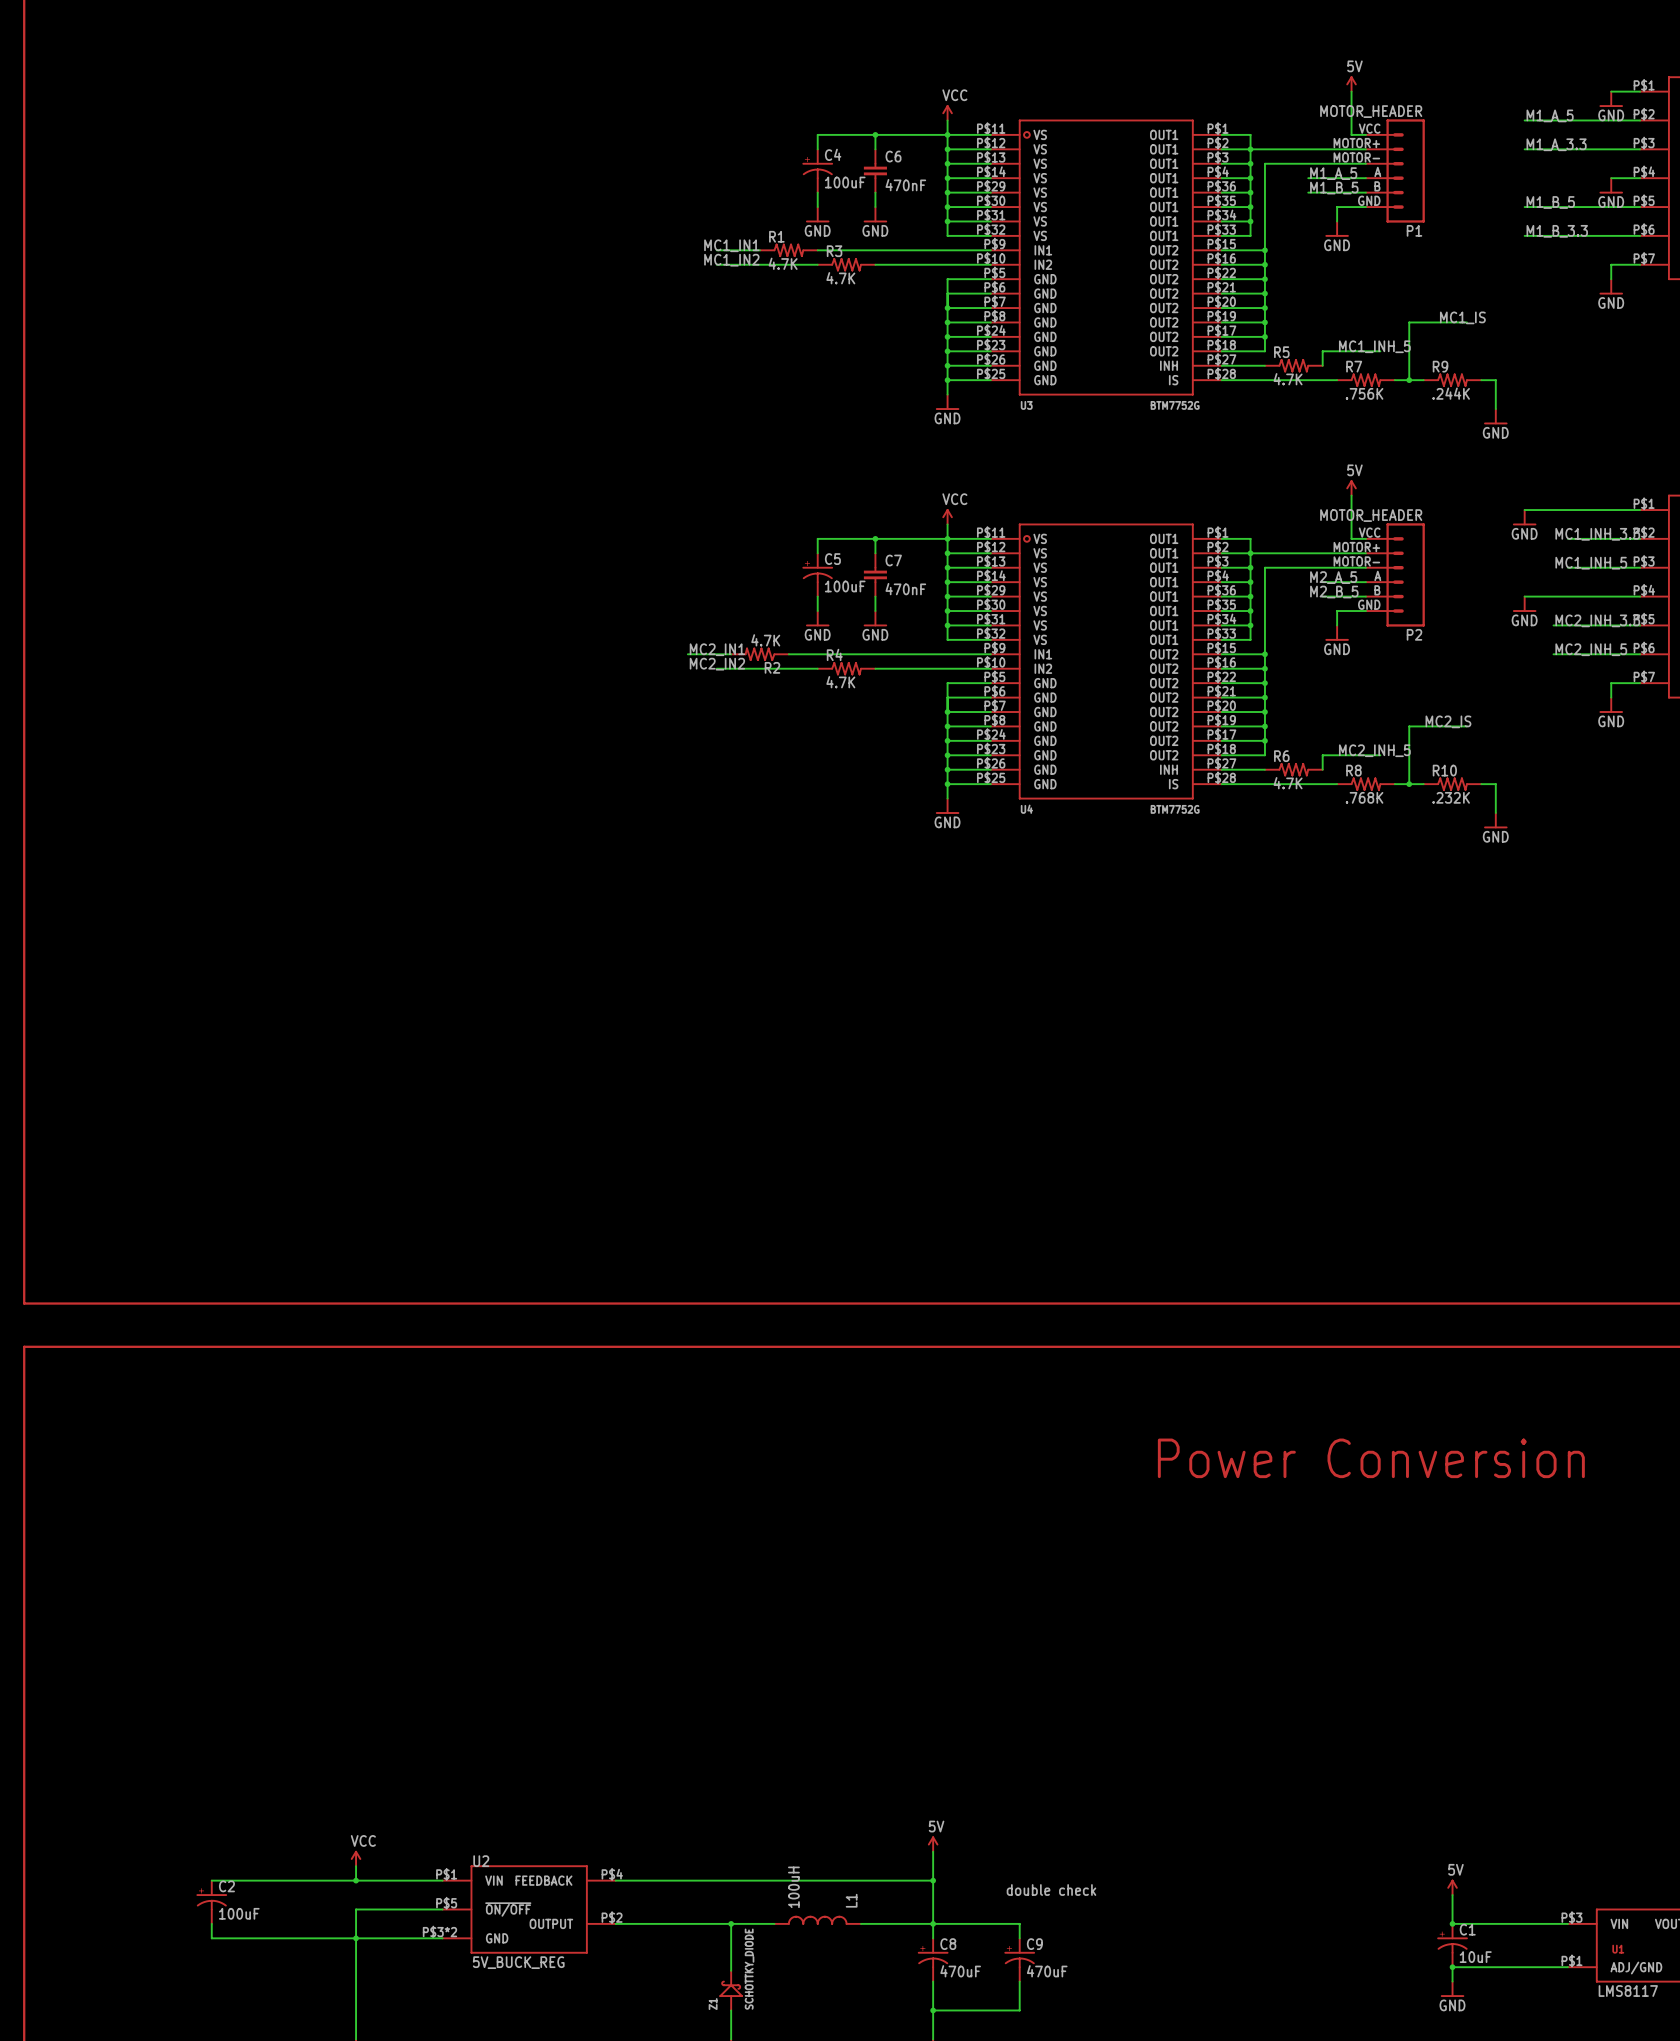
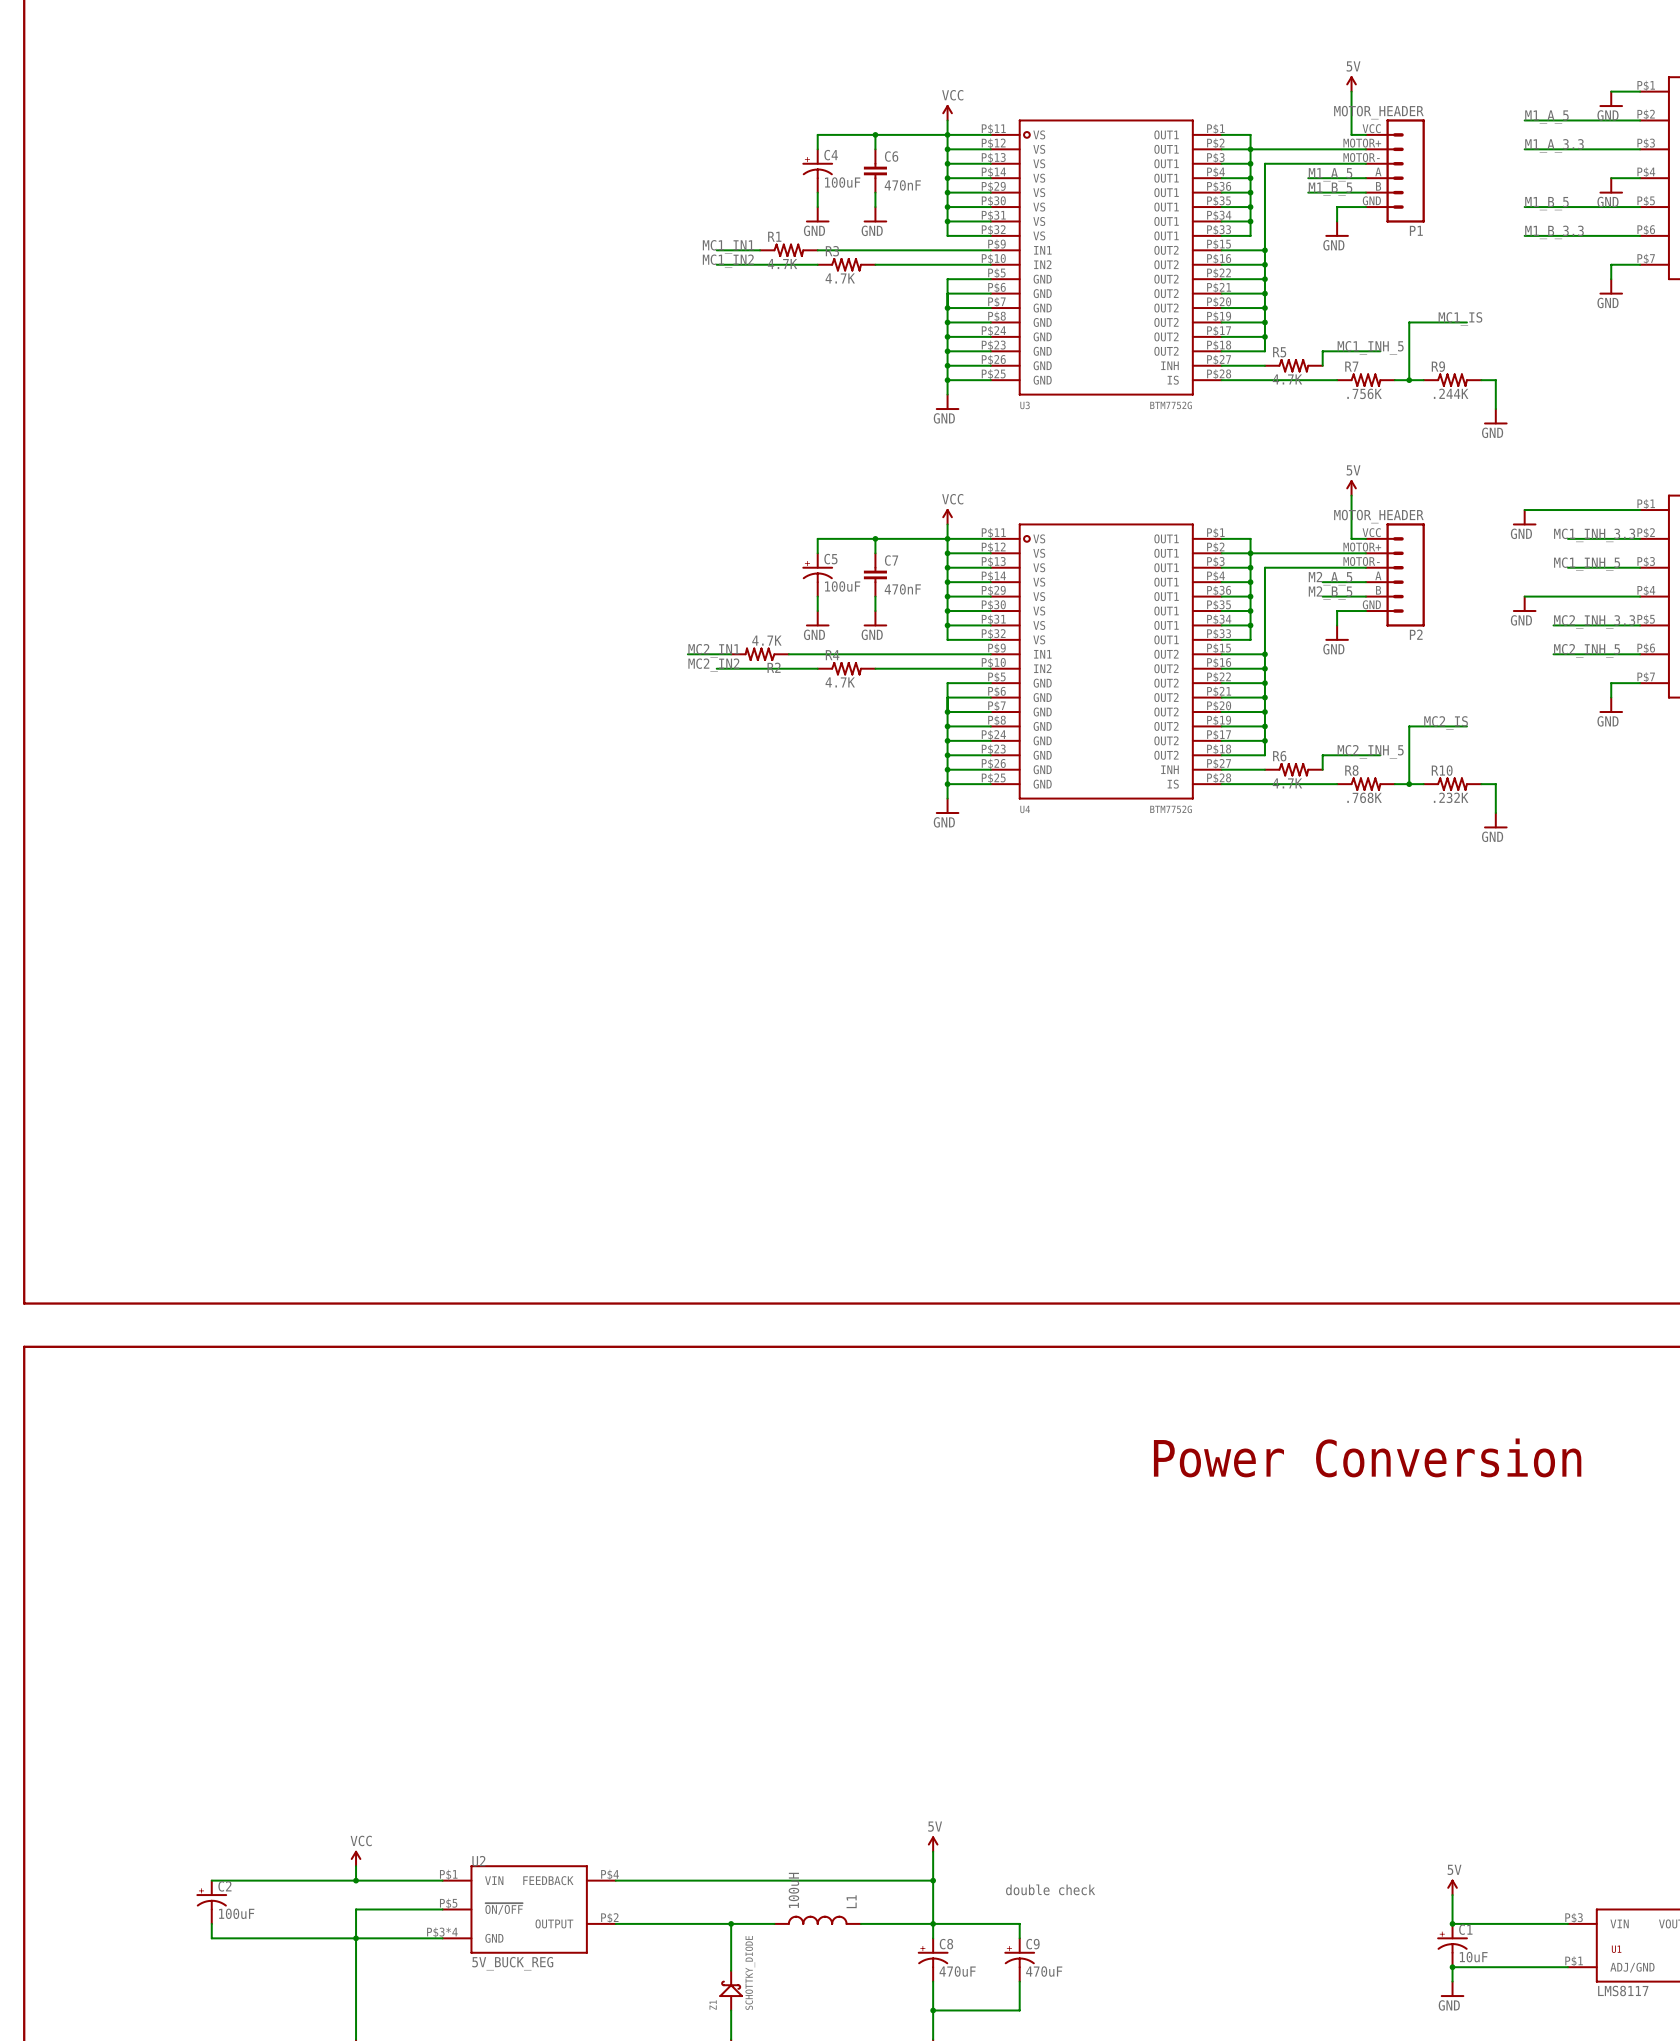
U2 pin number: P$3*2 (439, 1932) -> P$3*4 (442, 1932)

